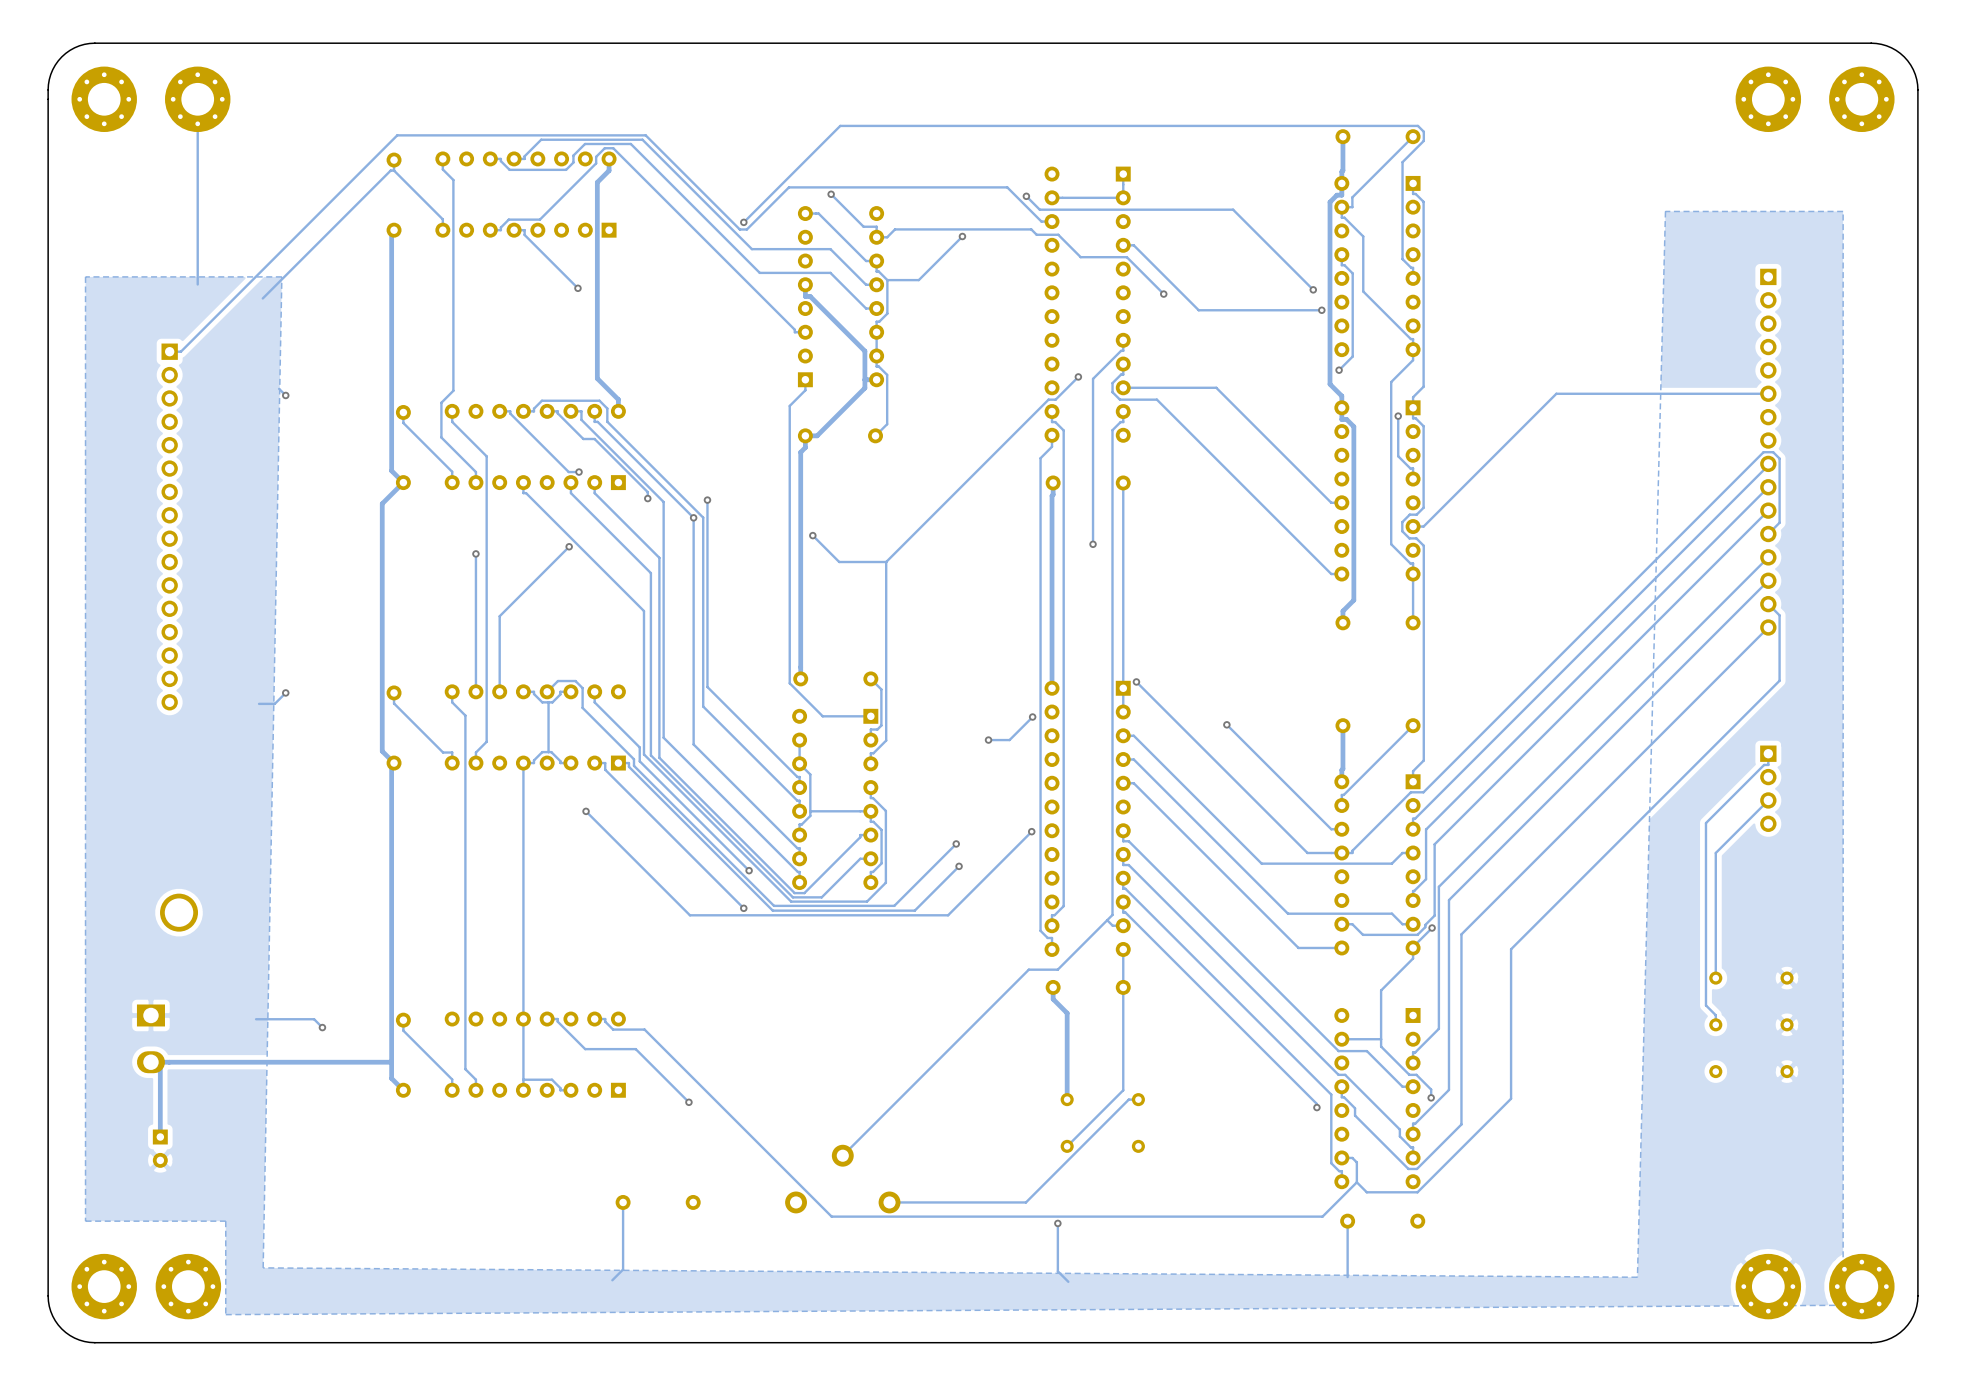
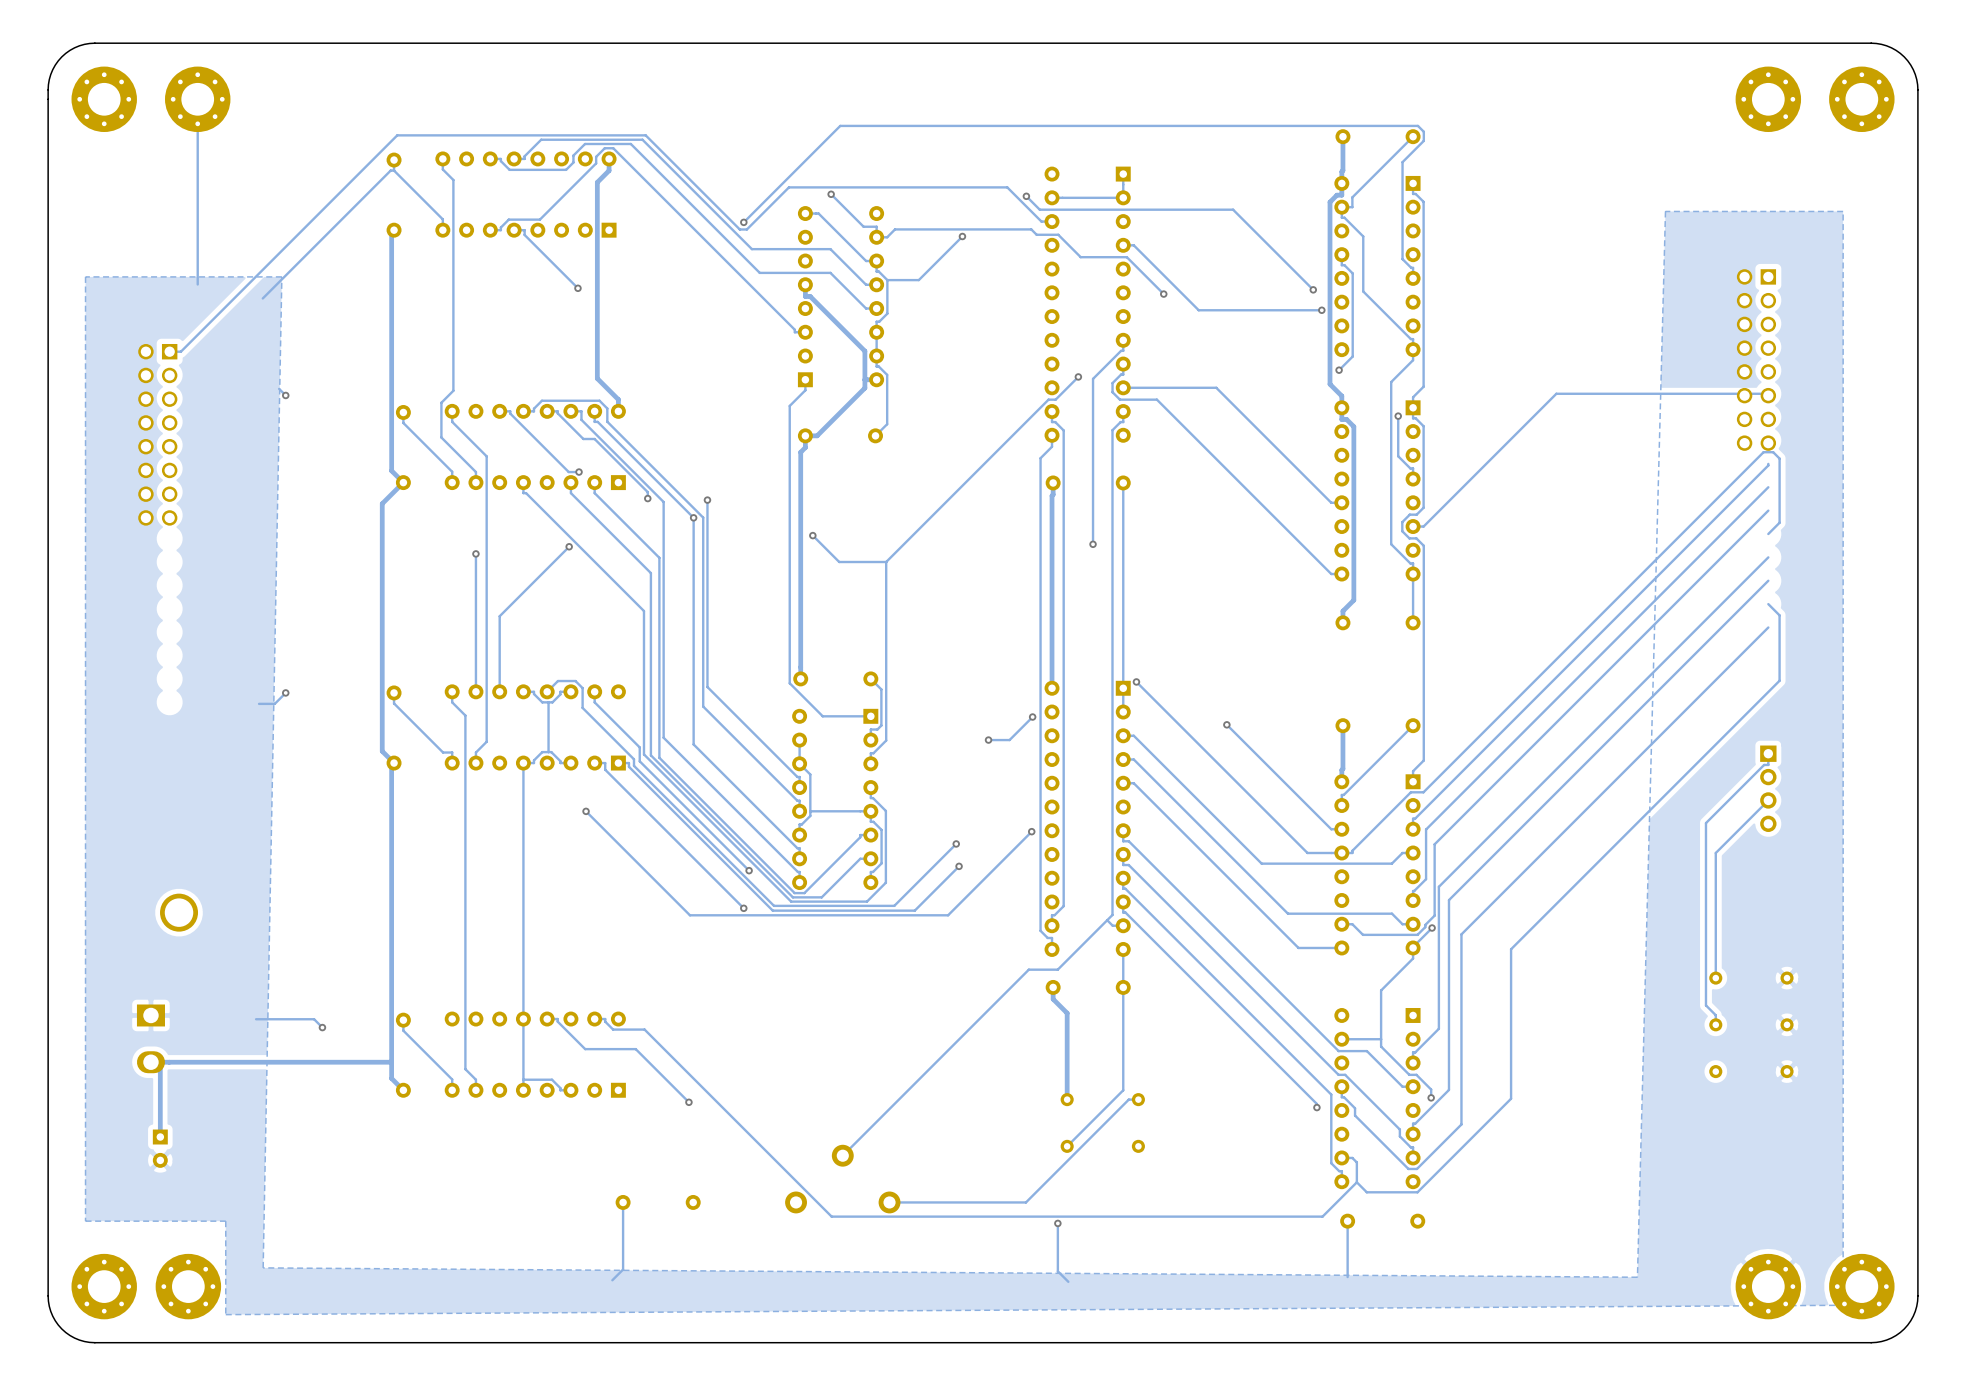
part: none -> (1756, 360)
part: none -> (157, 434)
part: (1768, 452) -> none
part: (169, 527) -> none

